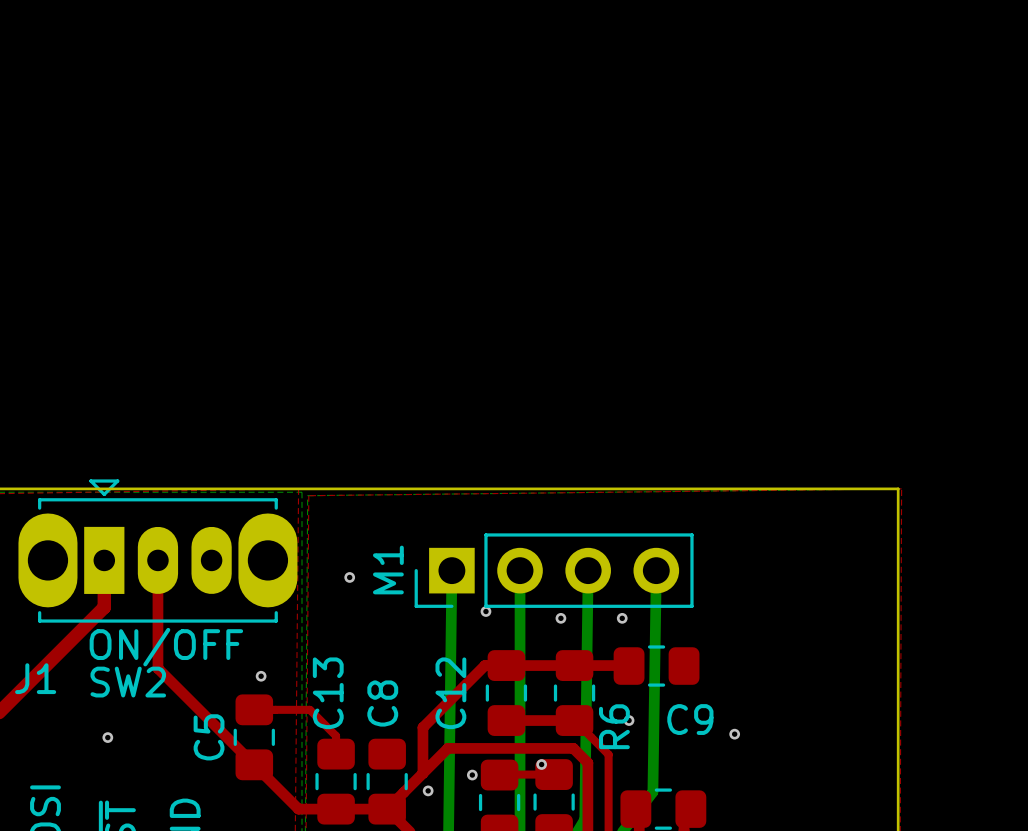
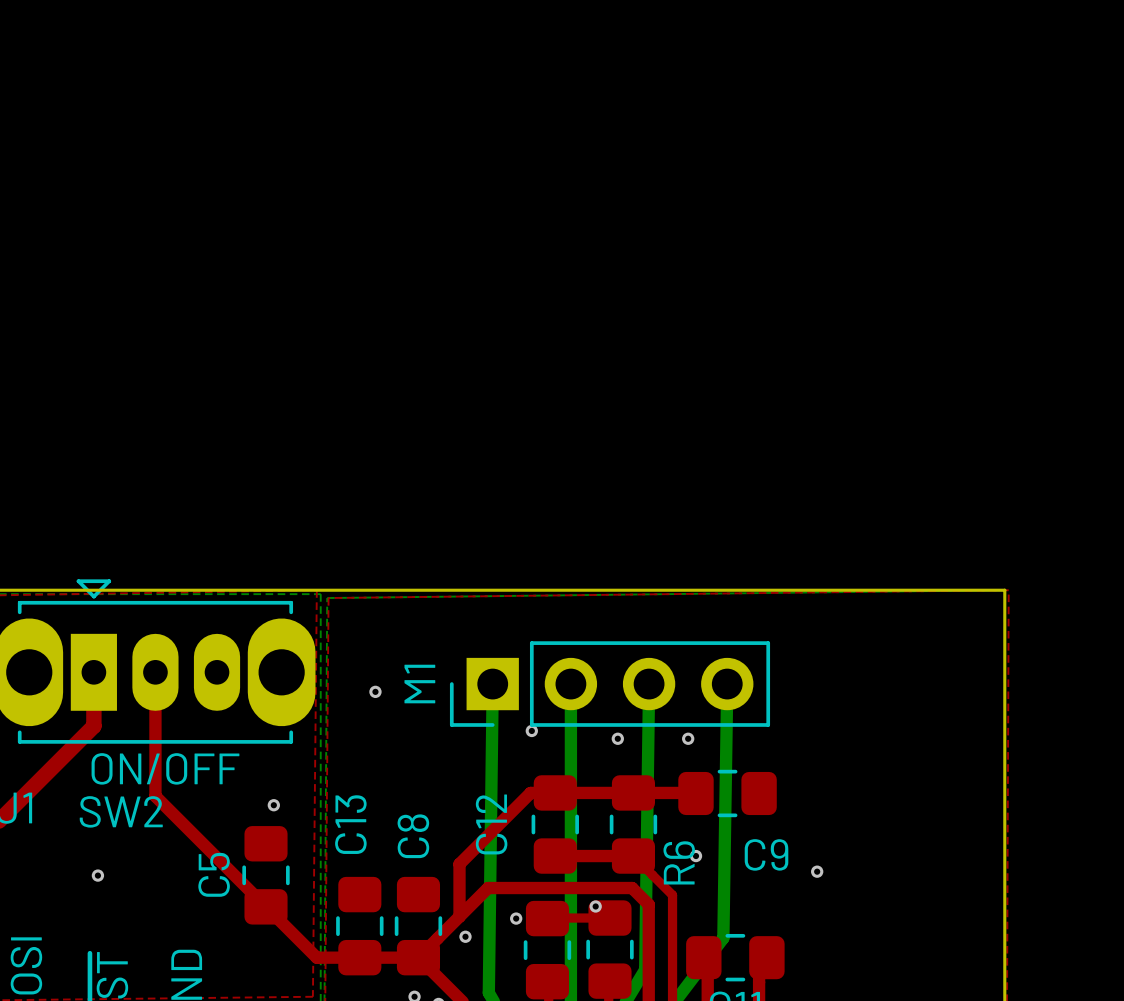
top track: (254, 709) (309, 709) (336, 736) (336, 754) -> none

